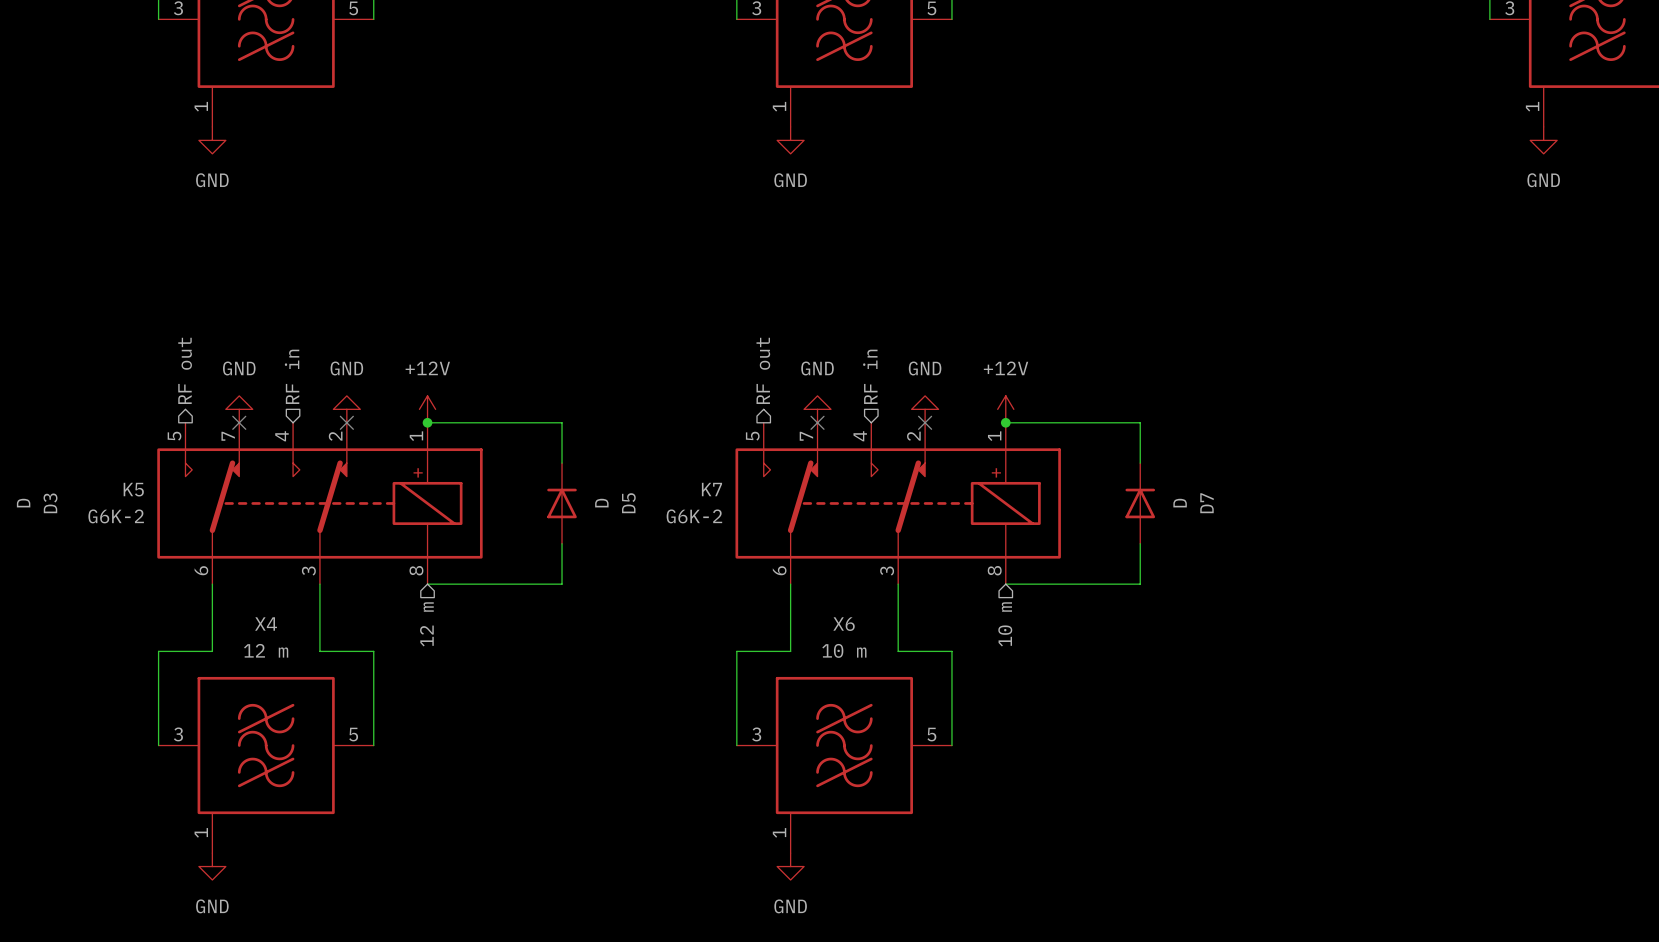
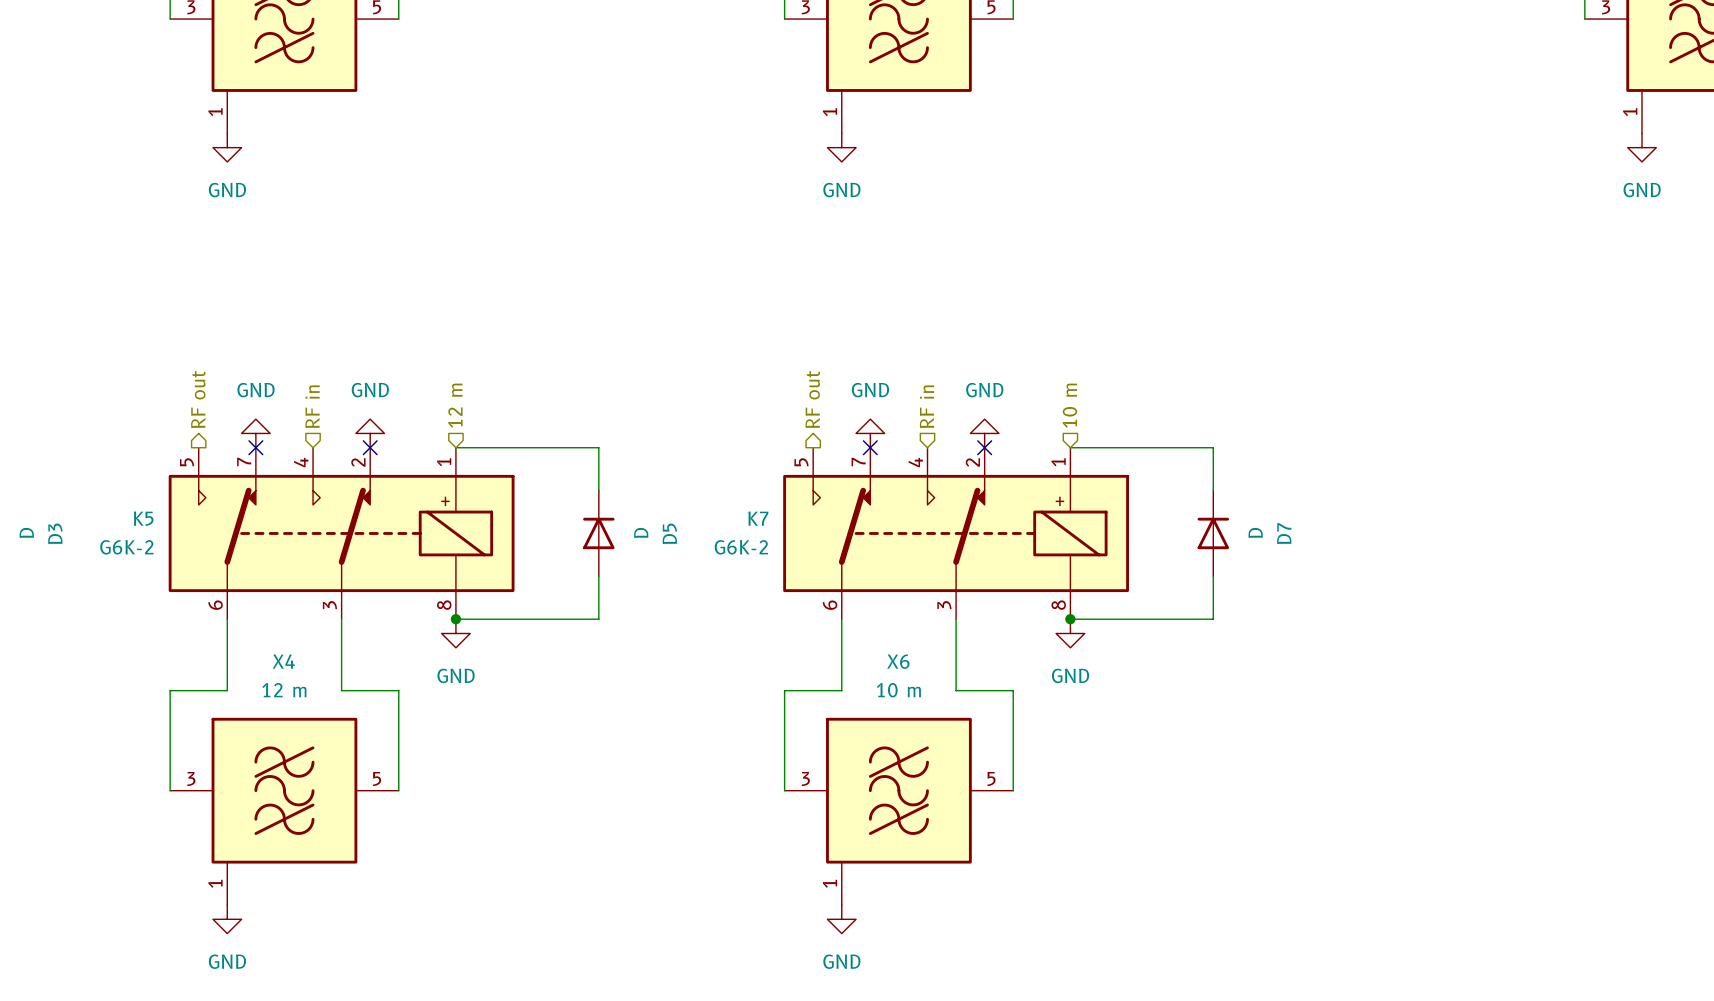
power symbol: +12V (427, 409) -> none
power symbol: +12V (1005, 409) -> none
junction: (427, 422) -> none
junction: (1005, 422) -> none
junction: none -> (455, 619)
junction: none -> (1070, 619)
power symbol: none -> GND (455, 633)
power symbol: none -> GND (1070, 633)
hierarchical label rotation: 0° (426, 624) -> 180° (455, 405)
hierarchical label position: 12 m (426, 624) -> 12 m (455, 405)
hierarchical label rotation: 0° (1005, 624) -> 180° (1069, 405)
hierarchical label position: 10 m (1005, 624) -> 10 m (1069, 405)

